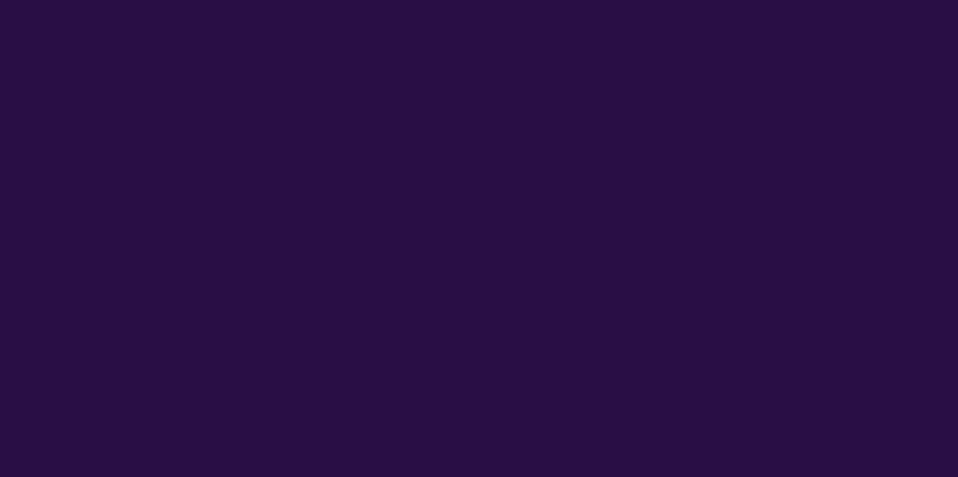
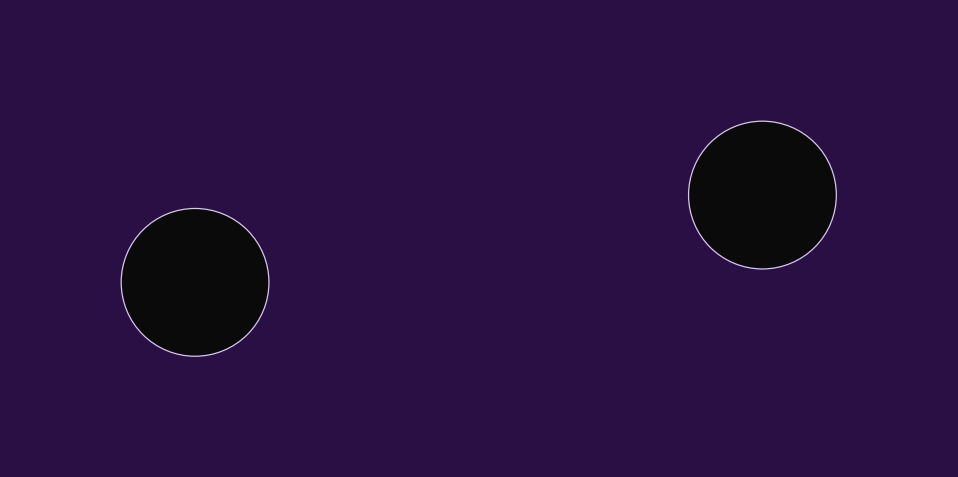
part: none -> (762, 195)
part: none -> (195, 282)

